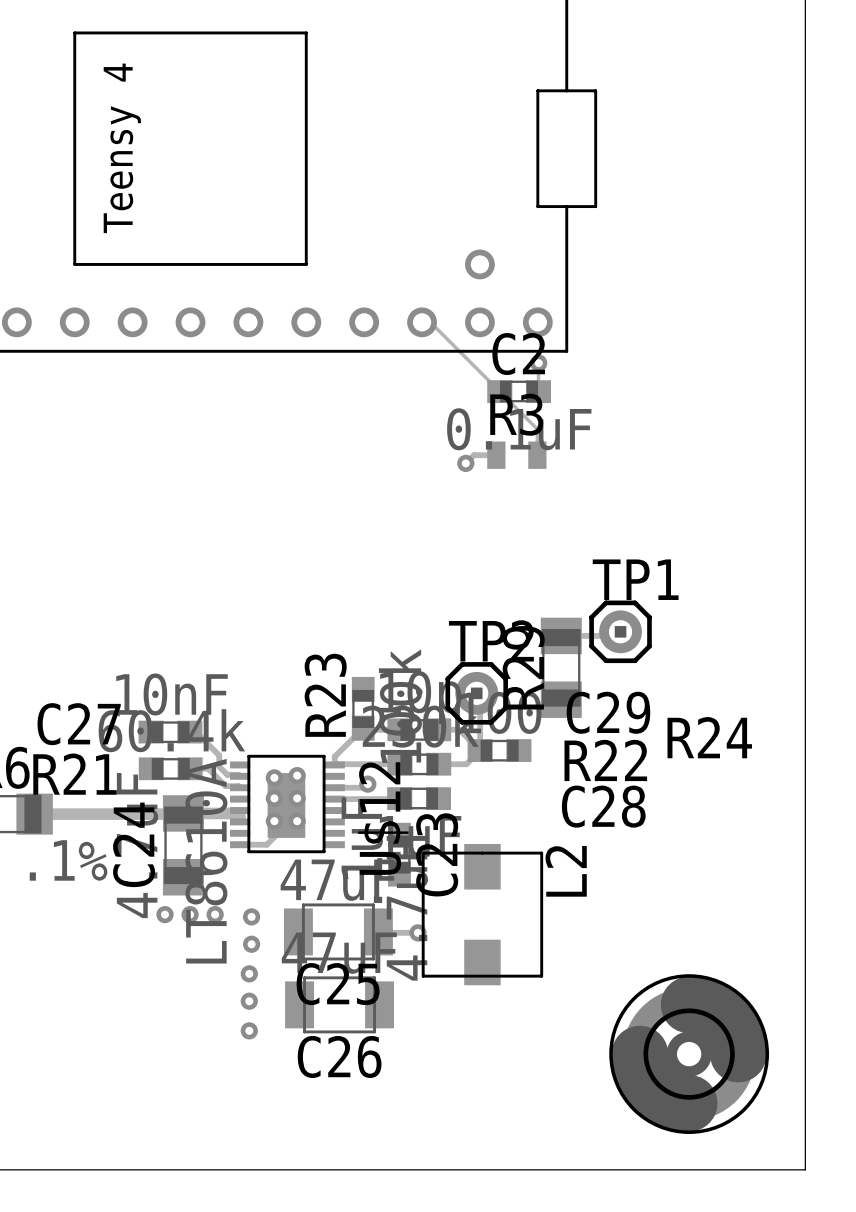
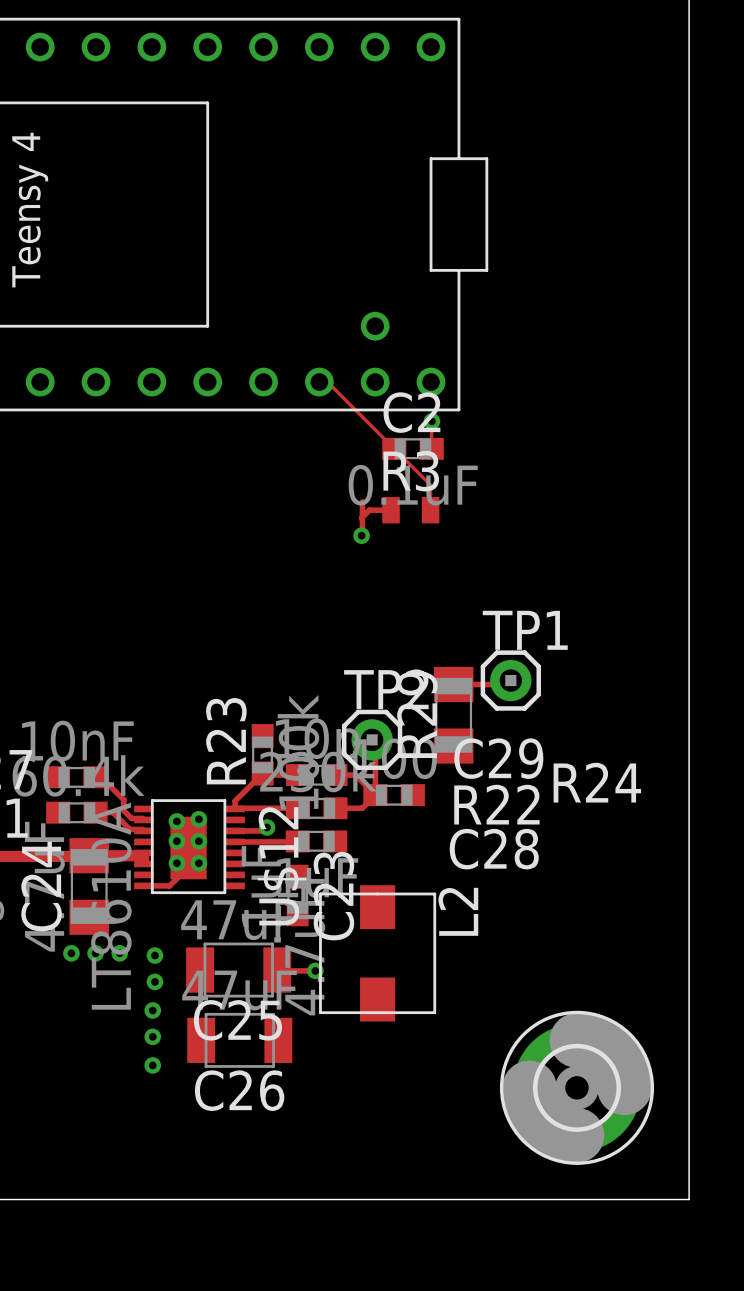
track: none -> (362, 501) (361, 535)
via position: (465, 463) -> (361, 535)

